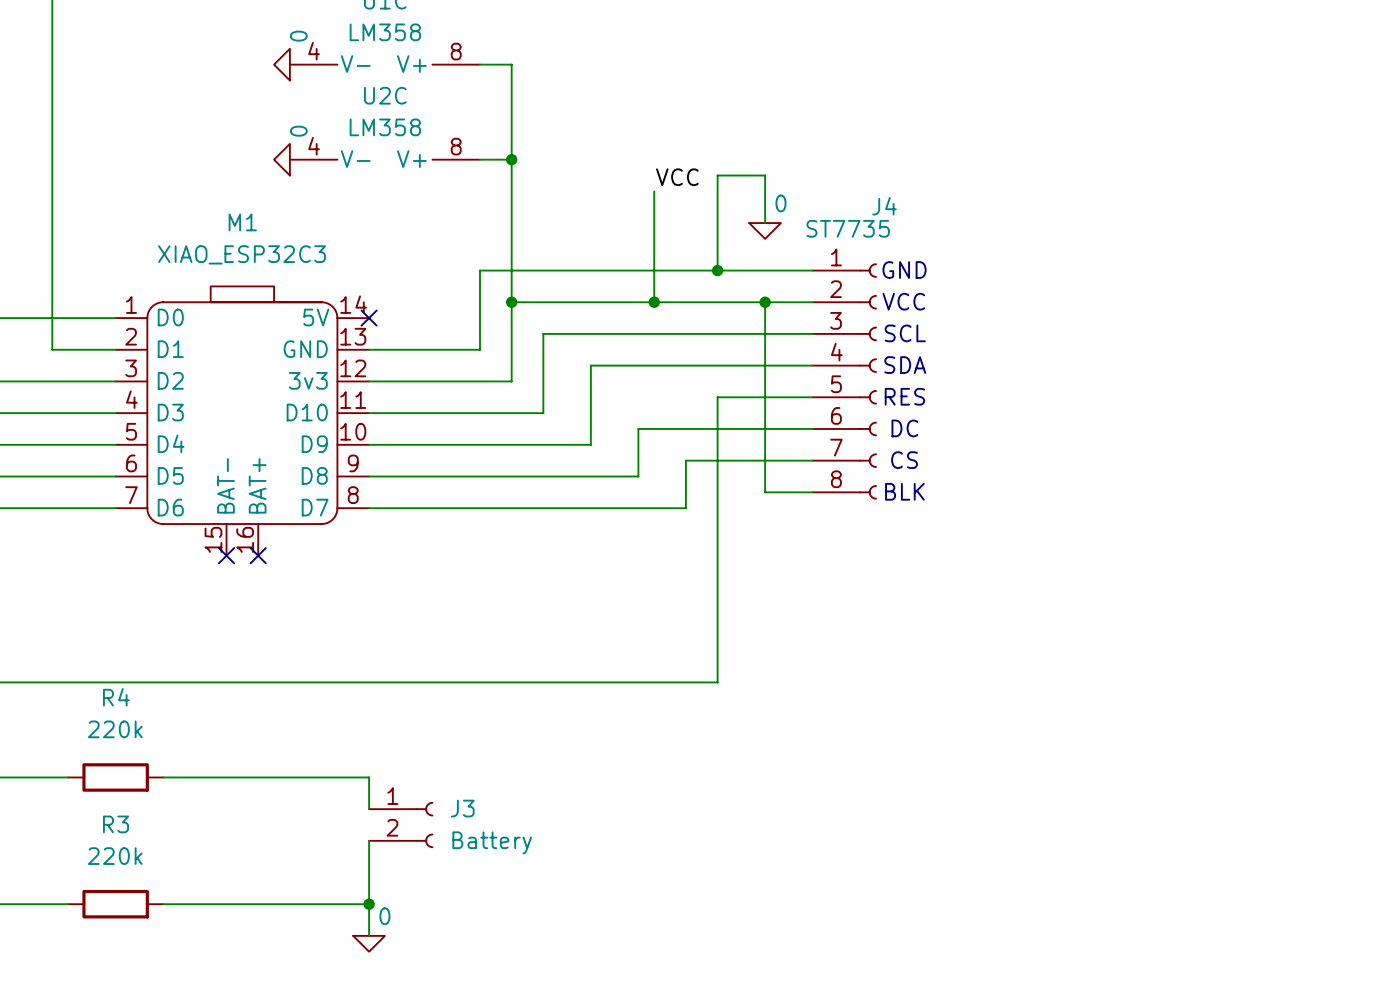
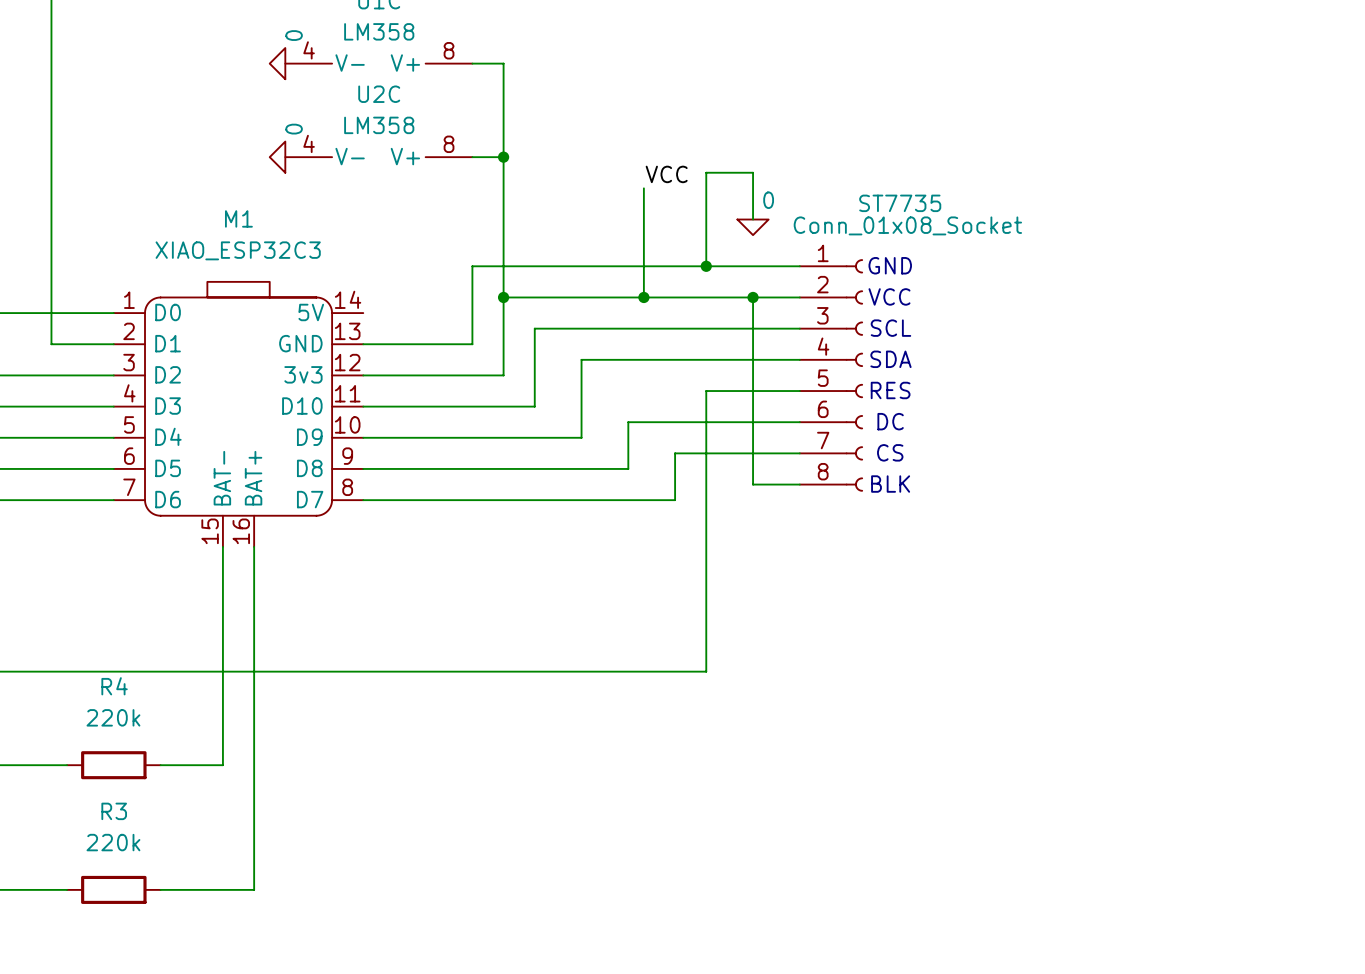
J4 name: J4 (884, 206) -> ST7735 (900, 203)
J4 value: ST7735 (848, 228) -> Conn_01x08_Socket (907, 225)
no-connect mark: (369, 318) -> none
no-connect mark: (226, 555) -> none
no-connect mark: (258, 555) -> none
wire: (226, 777) (369, 777) (369, 809) -> (222, 765) (222, 546)
J3: Battery (401, 825) -> none
wire: (369, 840) (369, 935) -> none
wire: (258, 904) (369, 904) -> (254, 889) (254, 546)
junction: (369, 904) -> none
power symbol: 0 (369, 943) -> none

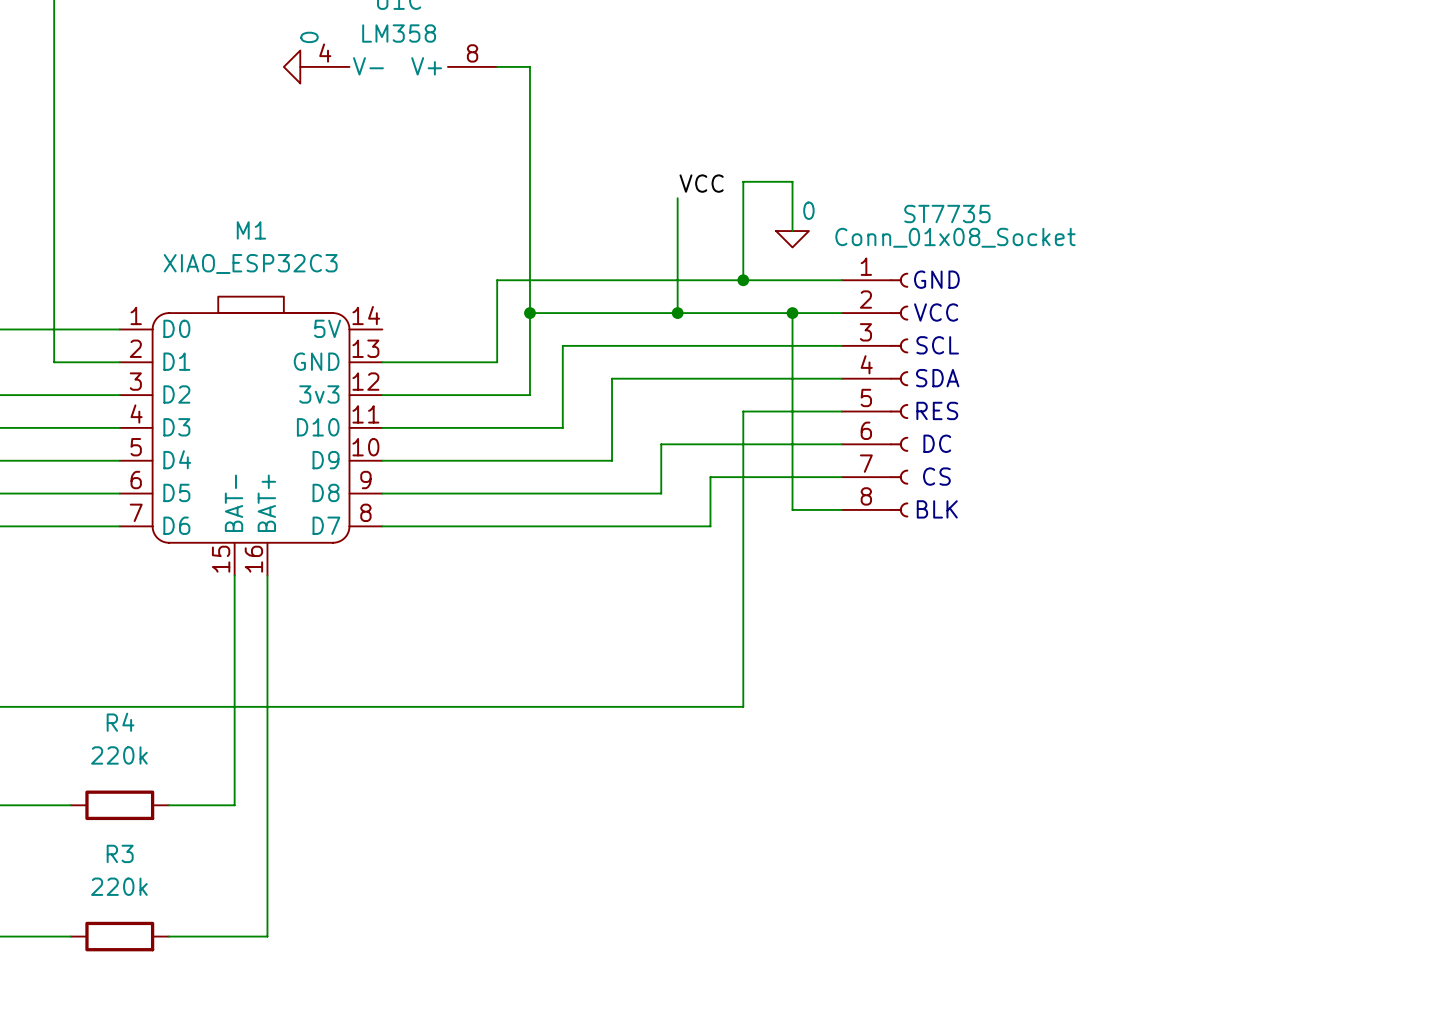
power symbol: 0 (277, 157) -> none
U2C: LM358 (378, 157) -> none
wire: (472, 157) (503, 157) -> none
junction: (503, 157) -> none

